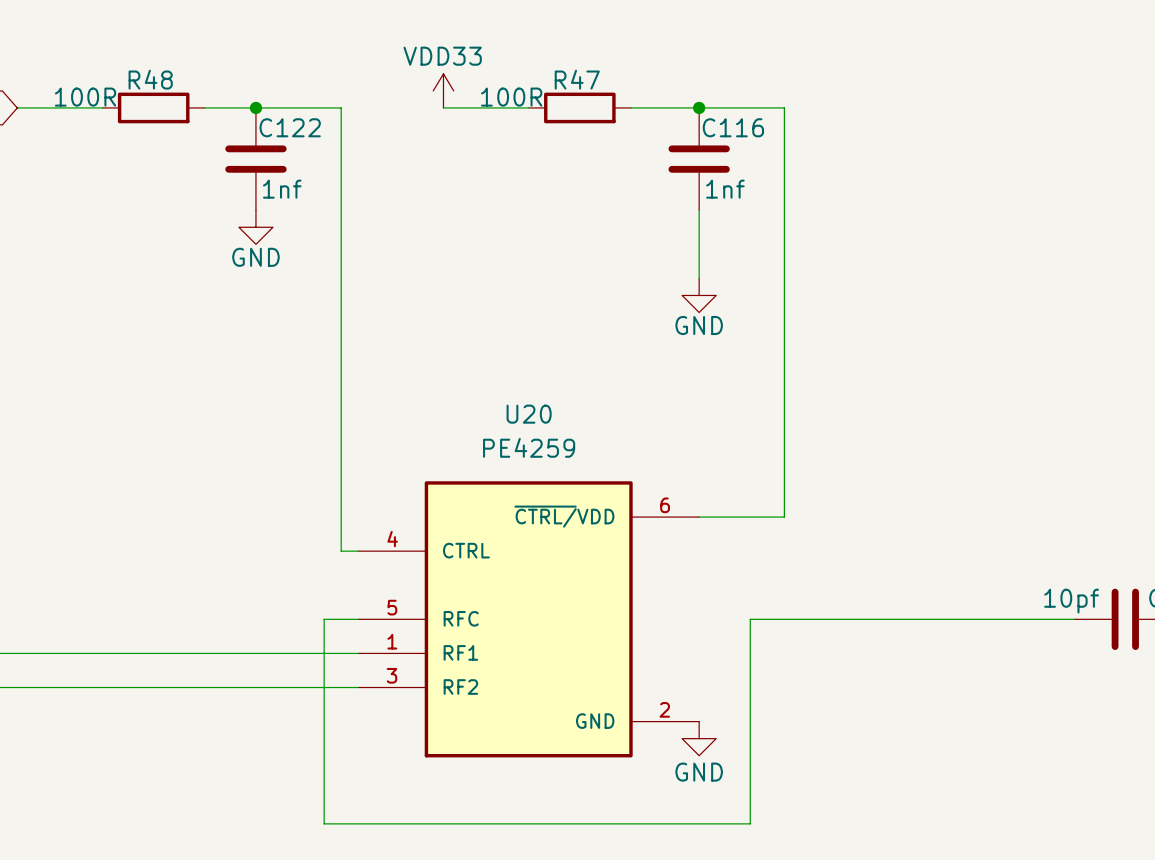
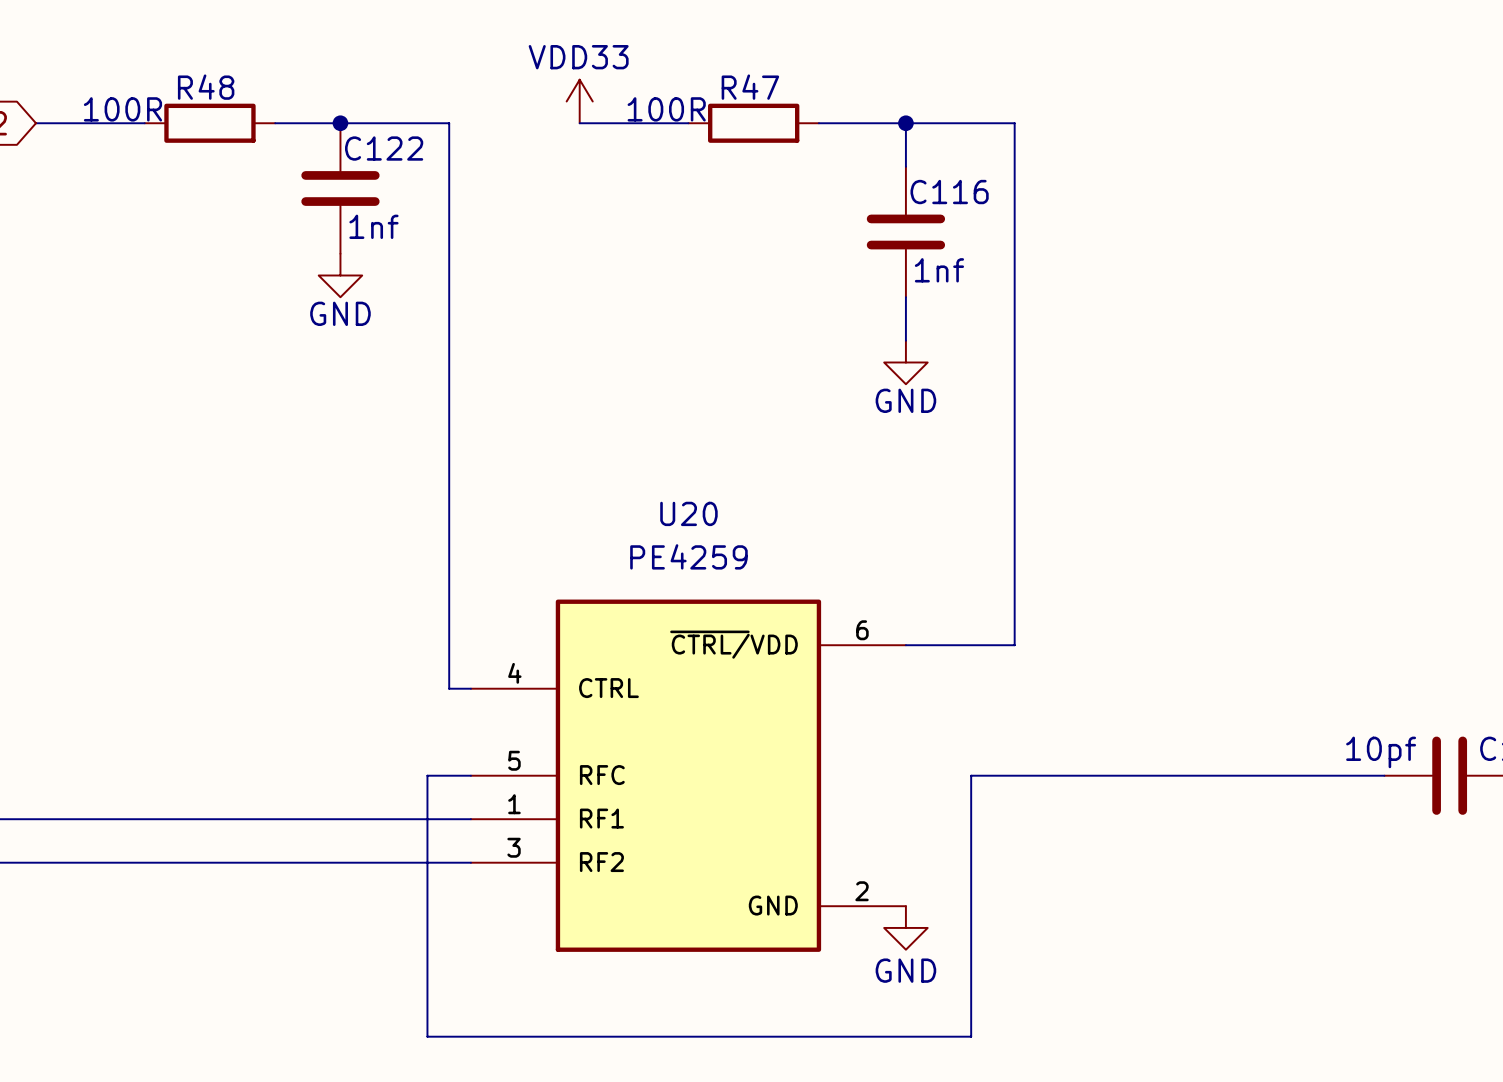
C116 position: (699, 159) -> (905, 231)

